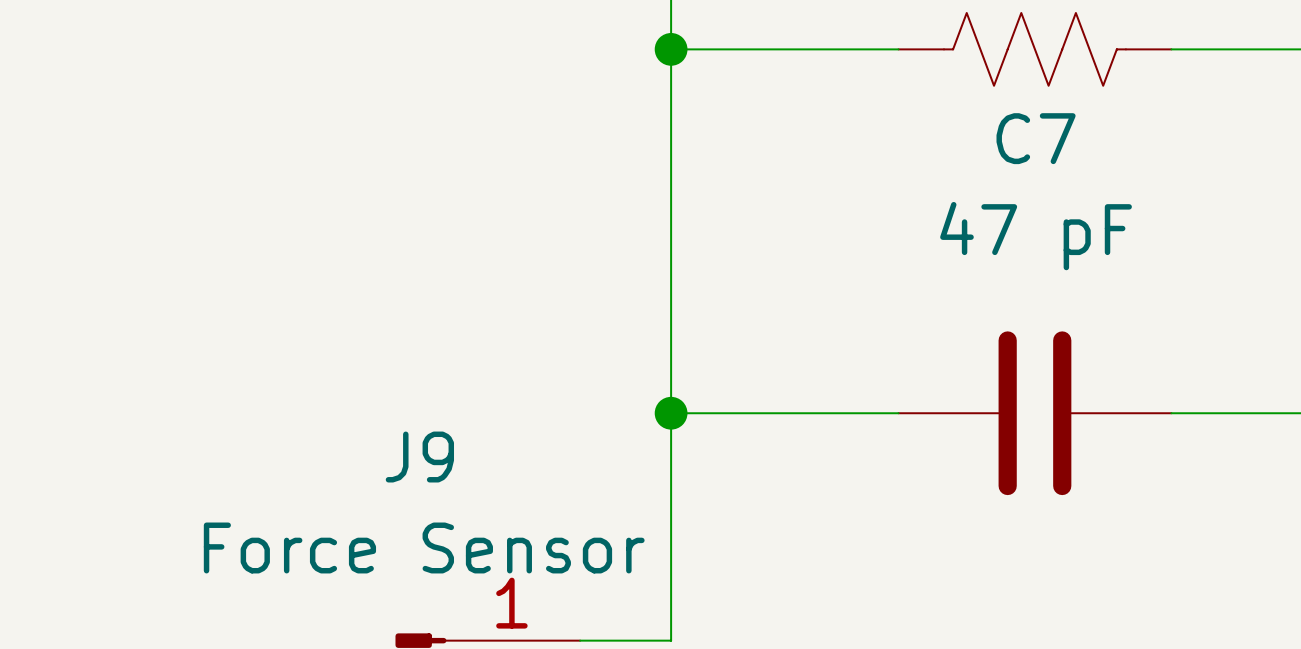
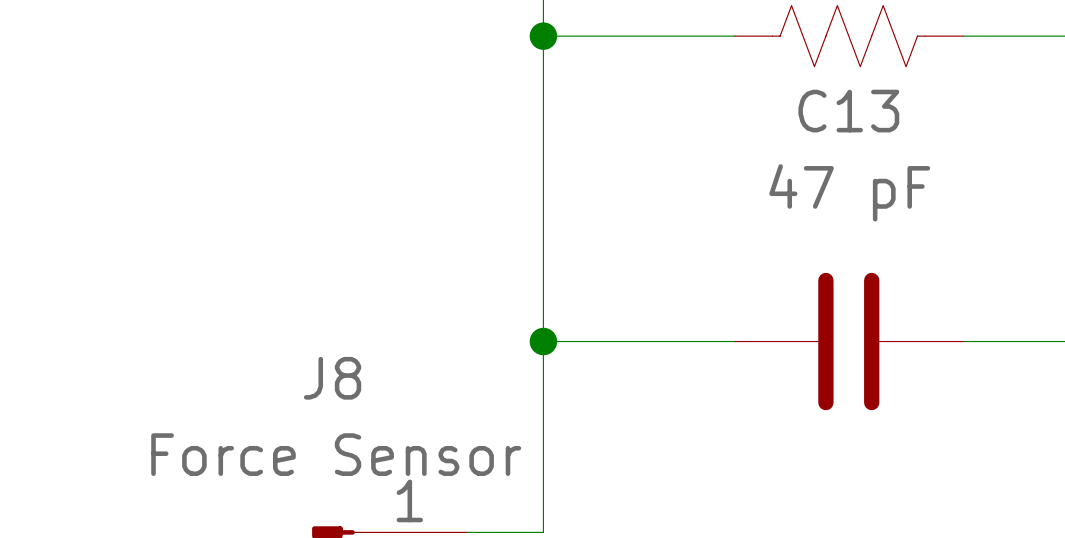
C7 name: C7 (1036, 138) -> C13 (848, 111)
J9 name: J9 (419, 457) -> J8 (332, 378)

